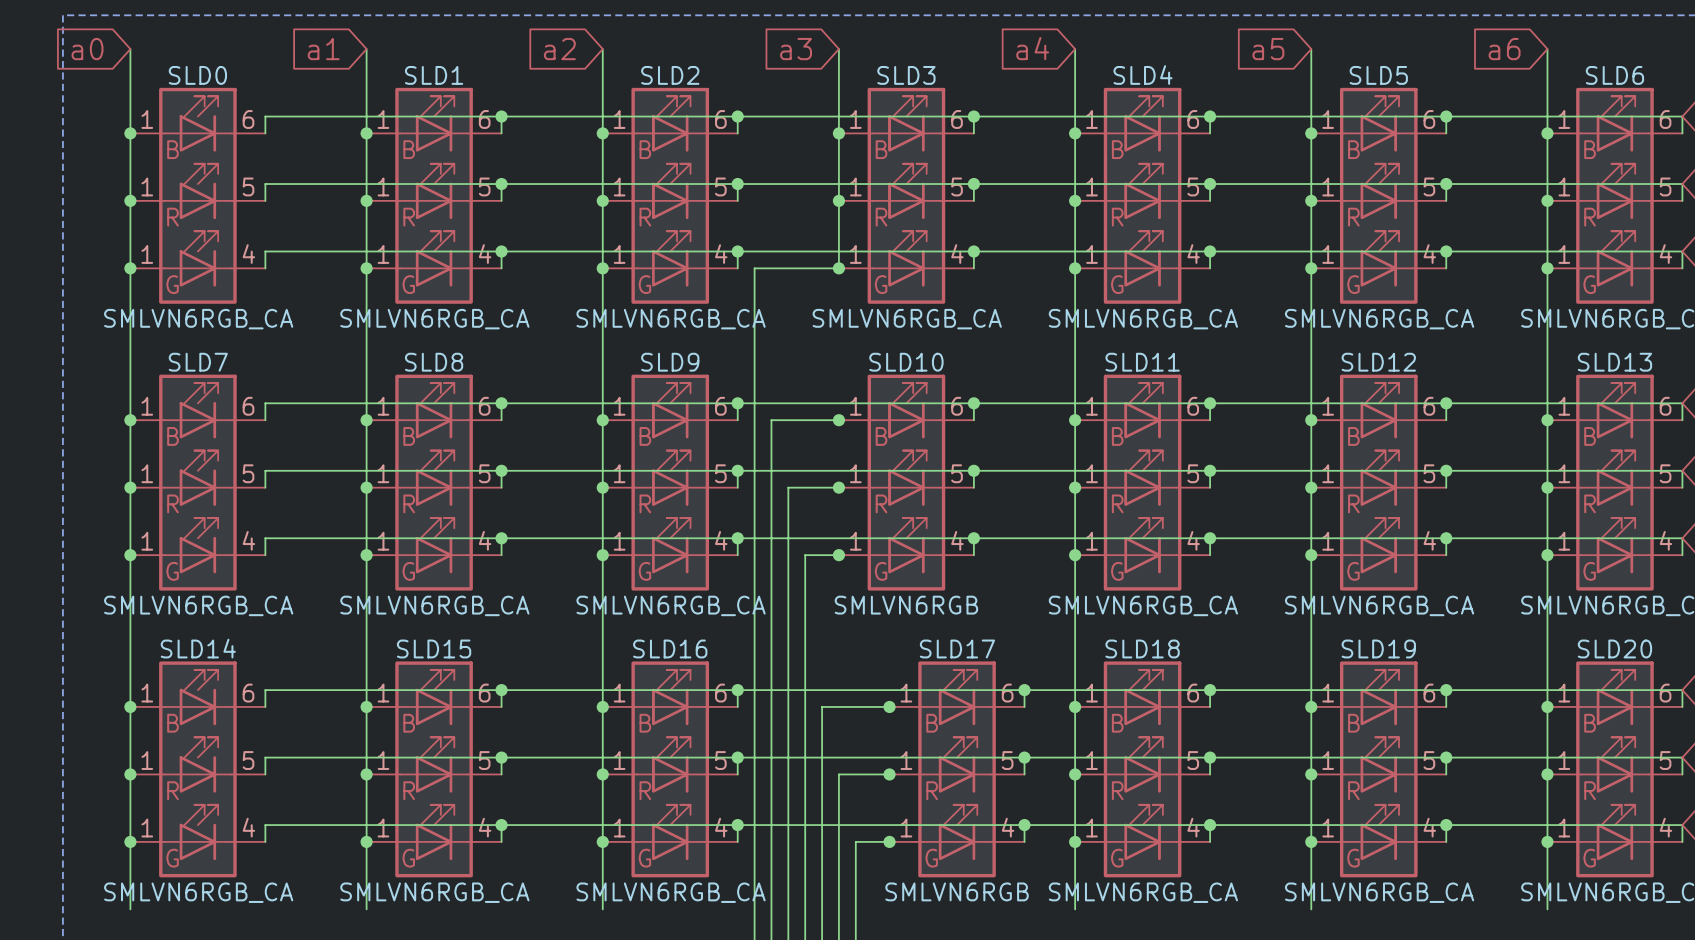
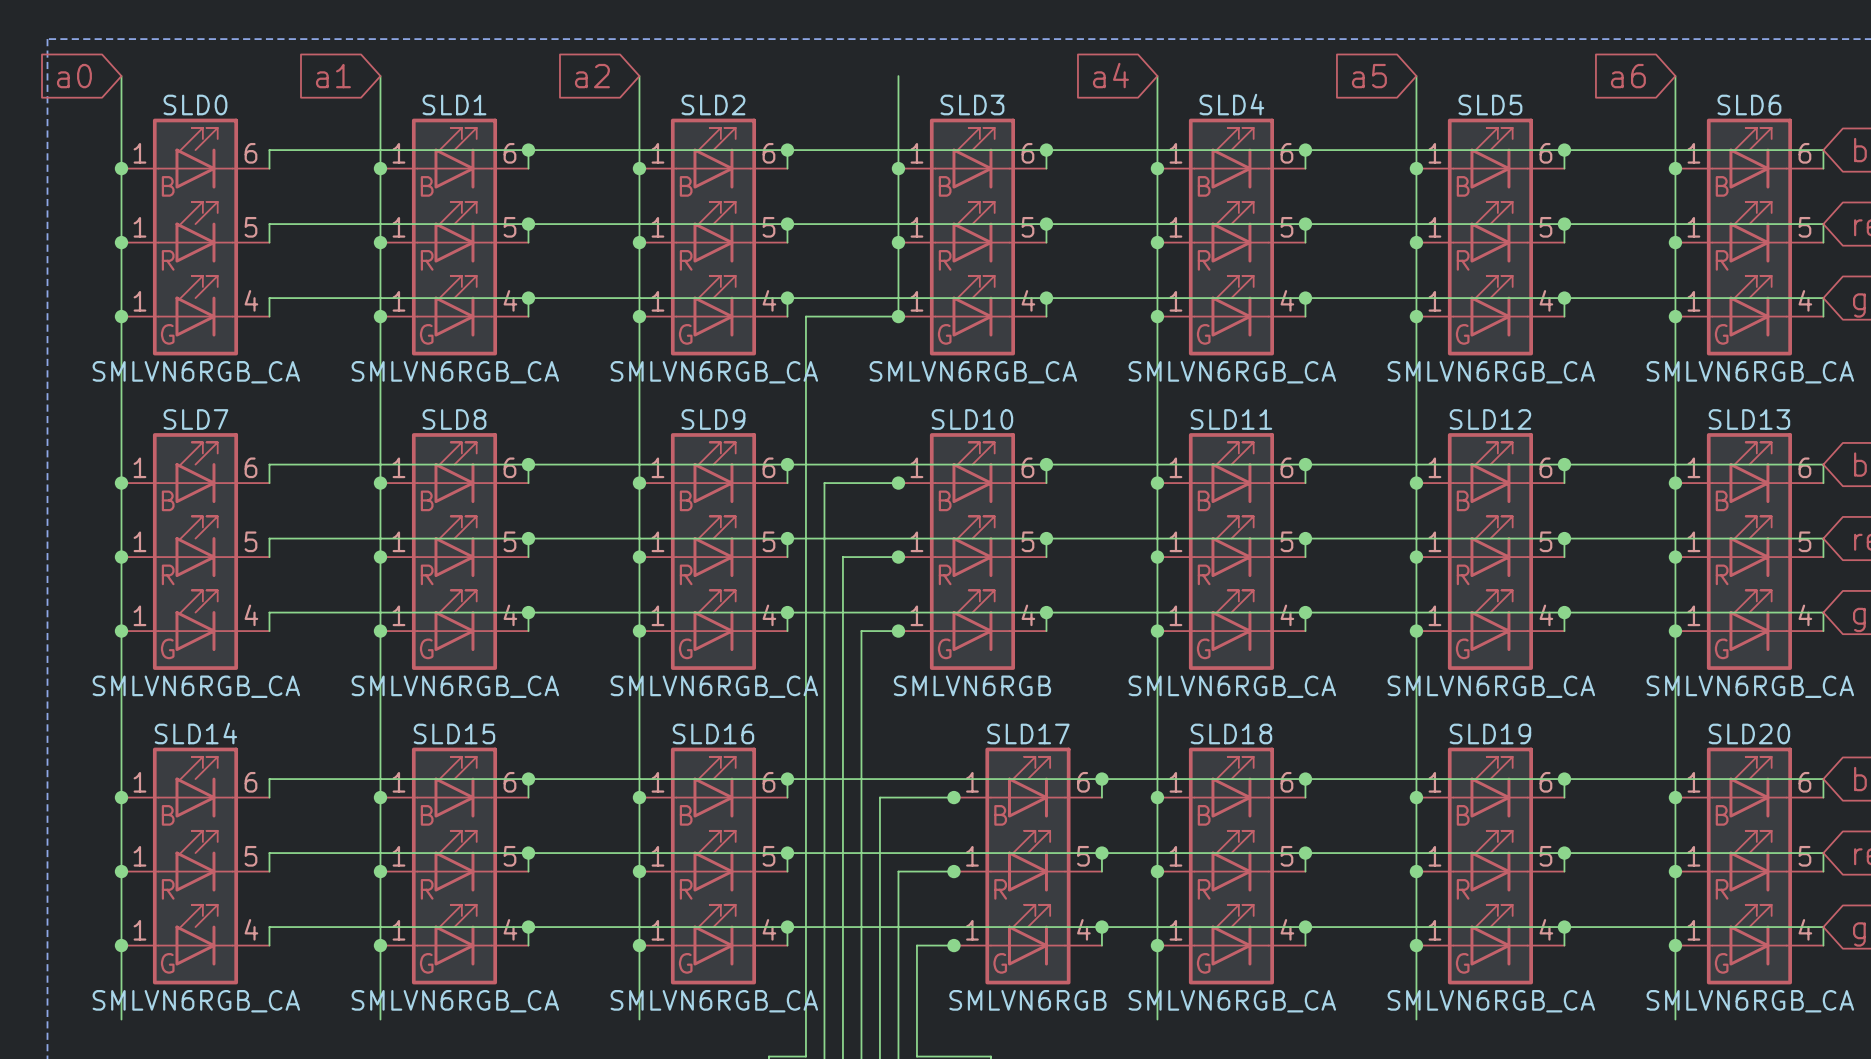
global label: a3 (796, 49) -> none

